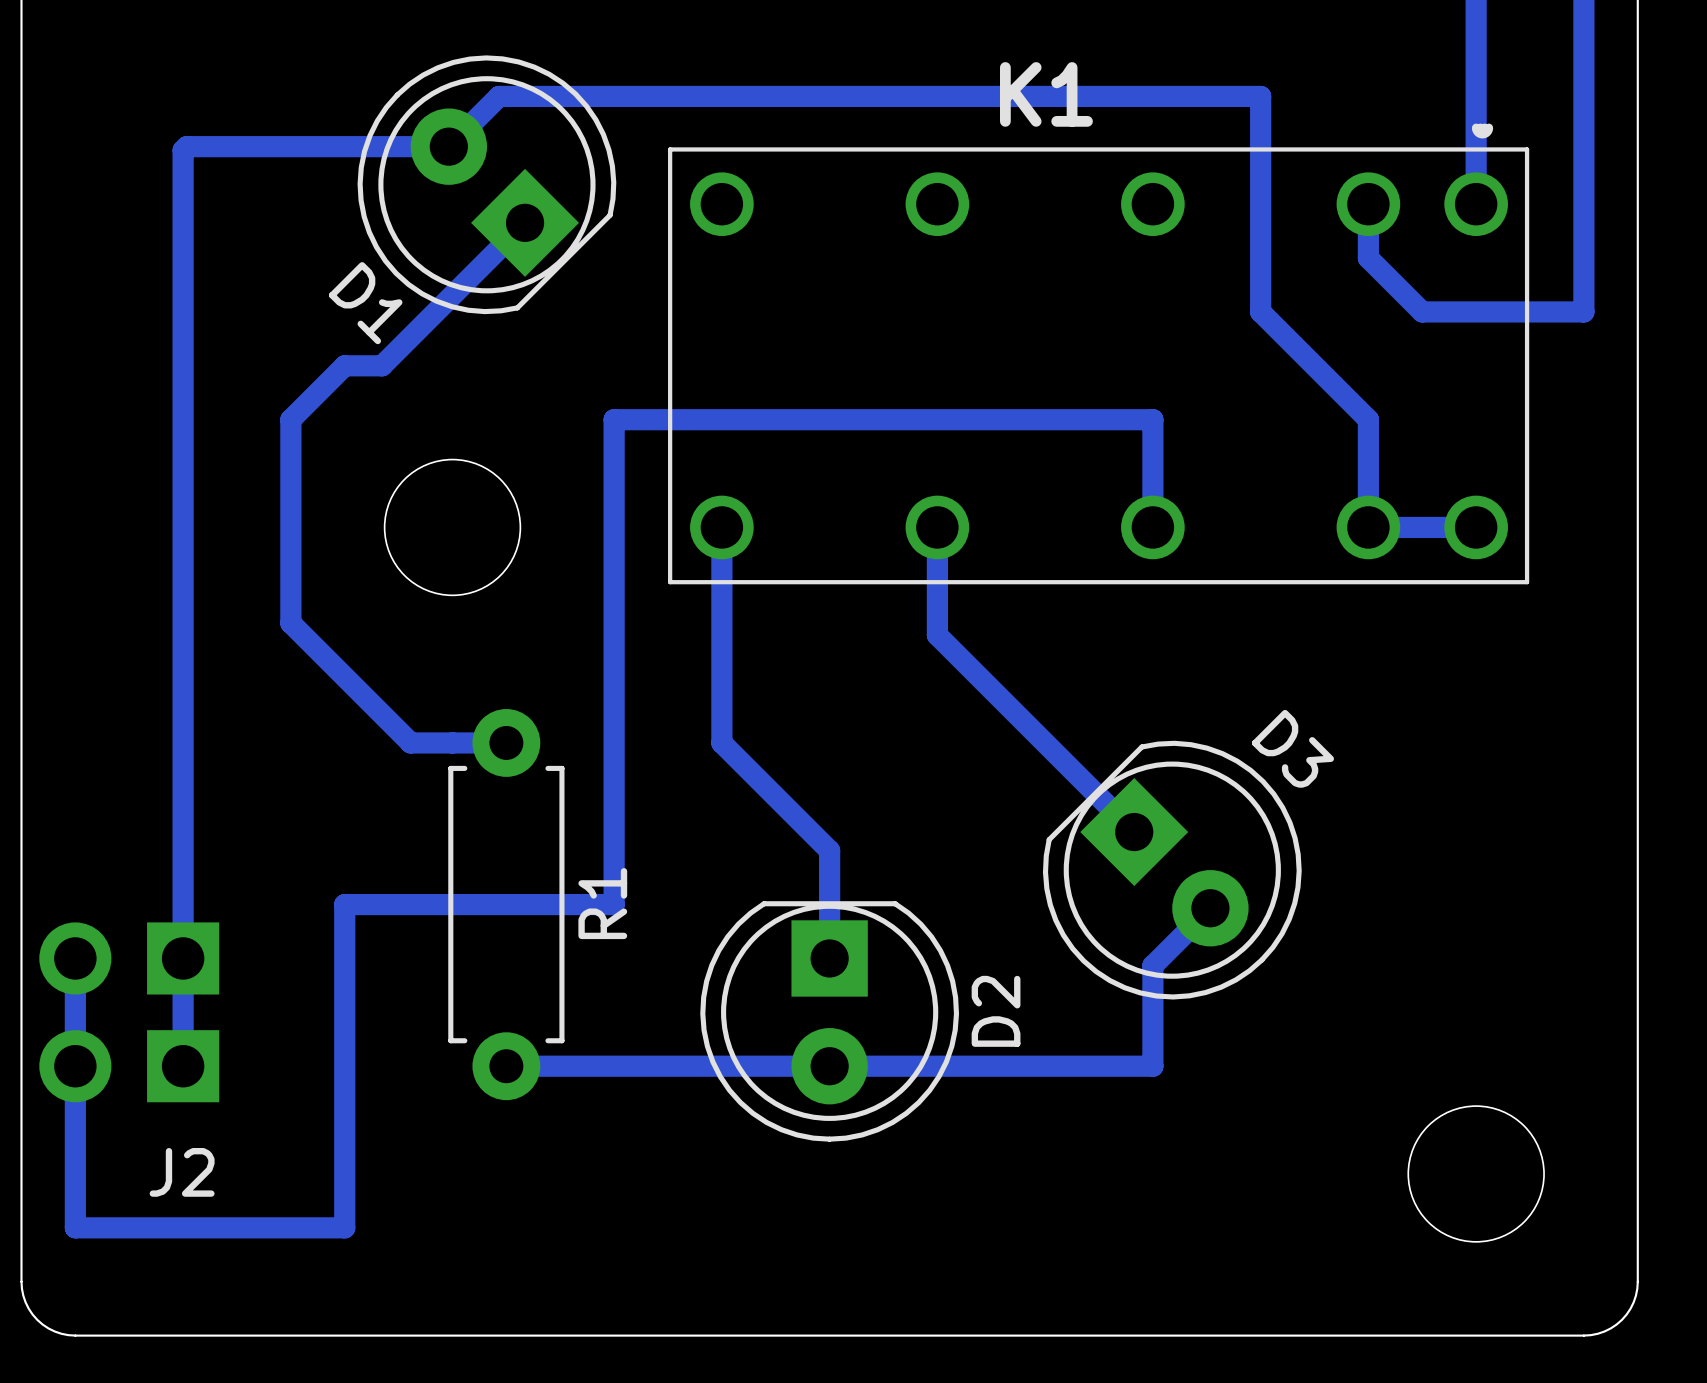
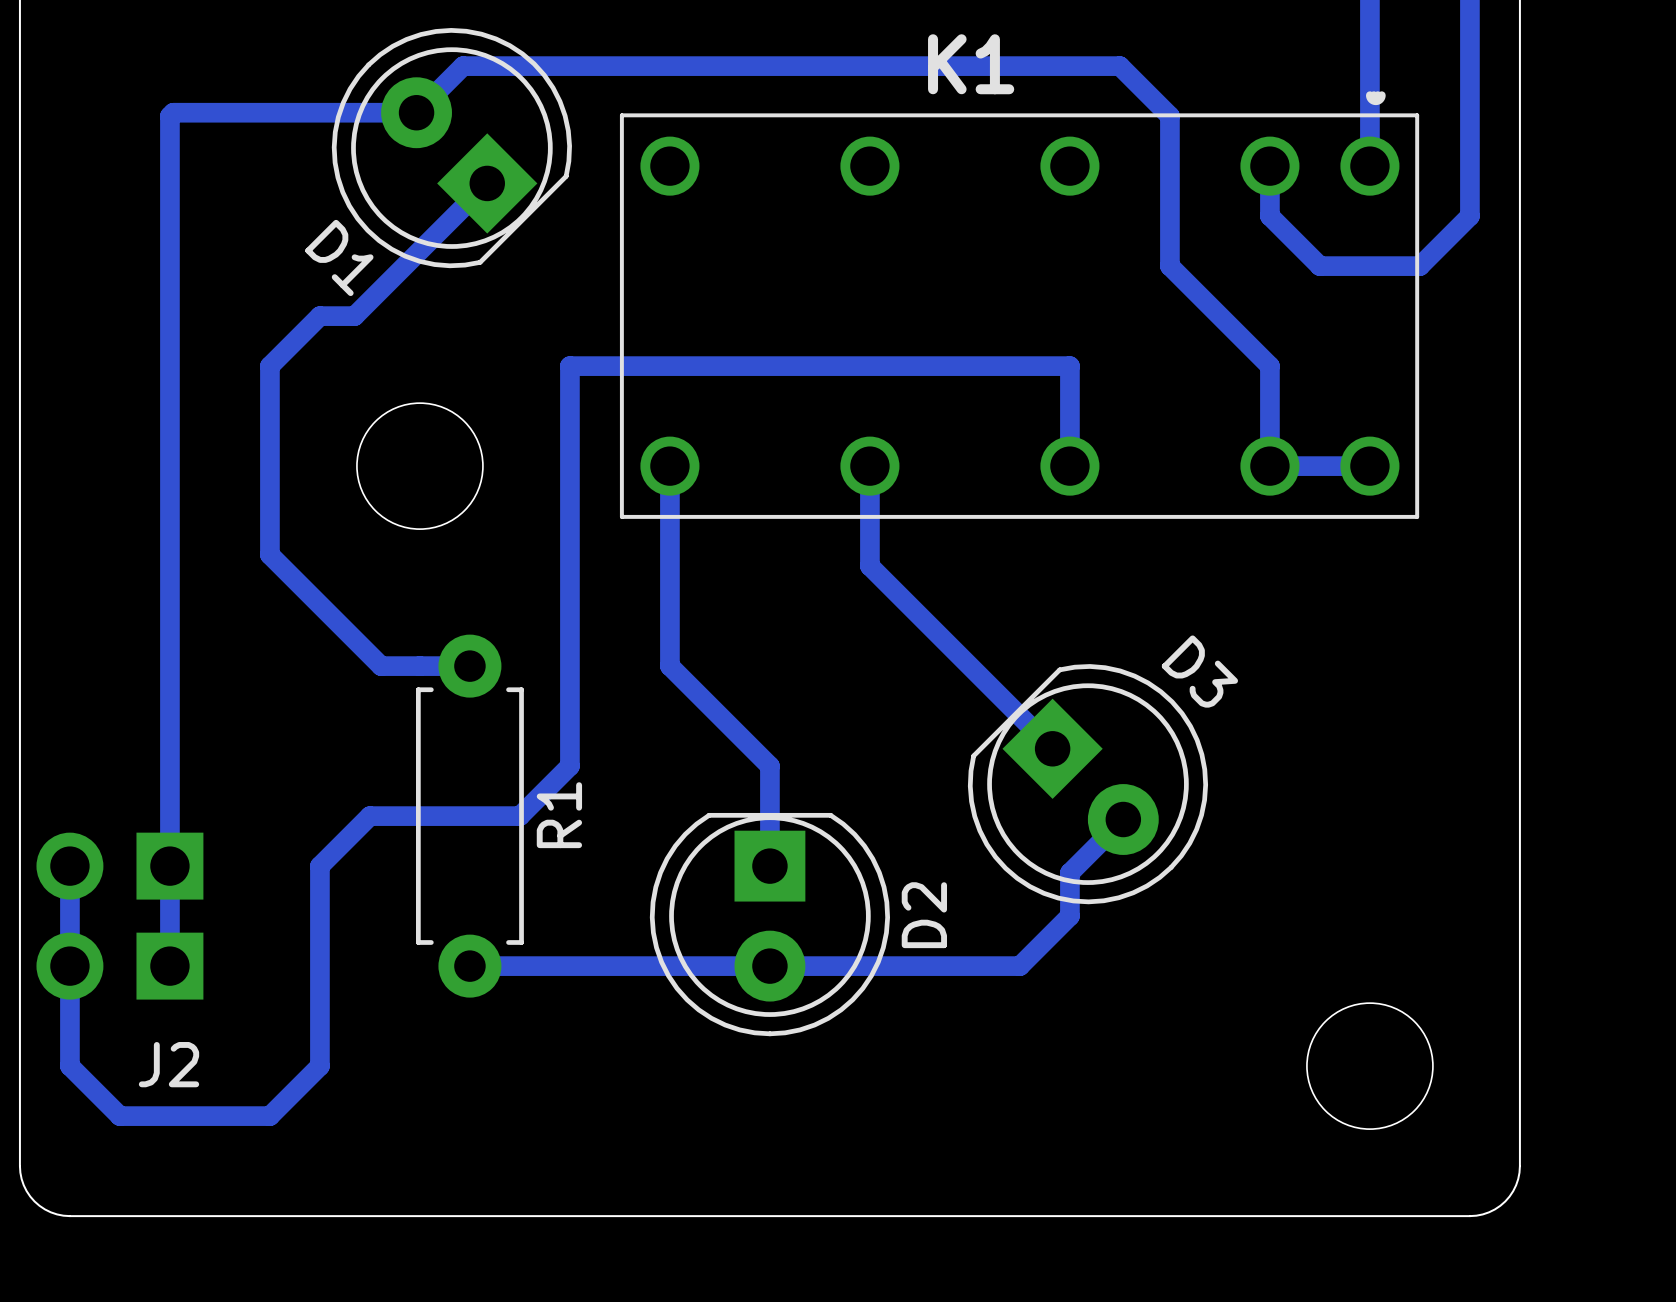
bottom track: (1206, 96) (1260, 96) (1260, 150) -> (1119, 66) (1169, 116)
bottom track: (1583, 258) (1583, 311) (1530, 311) -> (1469, 216) (1419, 266)
bottom track: (614, 850) (614, 904) (560, 904) -> (569, 766) (519, 816)
bottom track: (398, 904) (344, 904) (344, 958) -> (369, 816) (319, 866)
bottom track: (1152, 1012) (1152, 1066) (1099, 1066) -> (1069, 916) (1019, 966)
bottom track: (75, 1173) (75, 1227) (129, 1227) -> (69, 1066) (119, 1116)
bottom track: (344, 1173) (344, 1227) (290, 1227) -> (319, 1066) (269, 1116)

